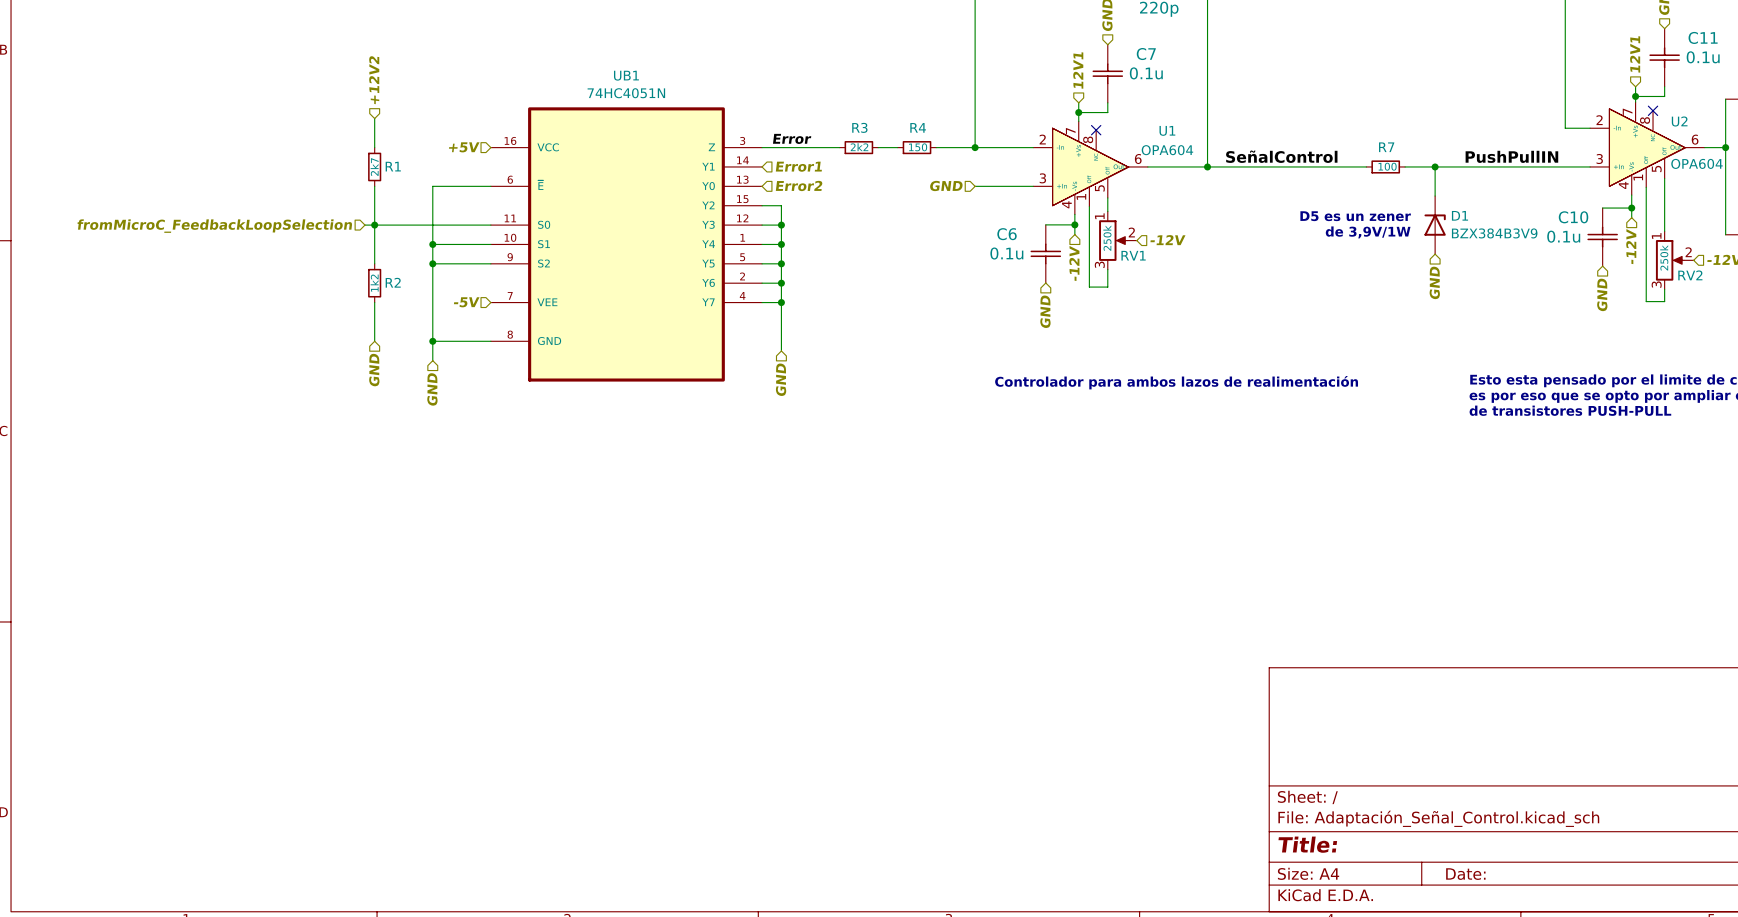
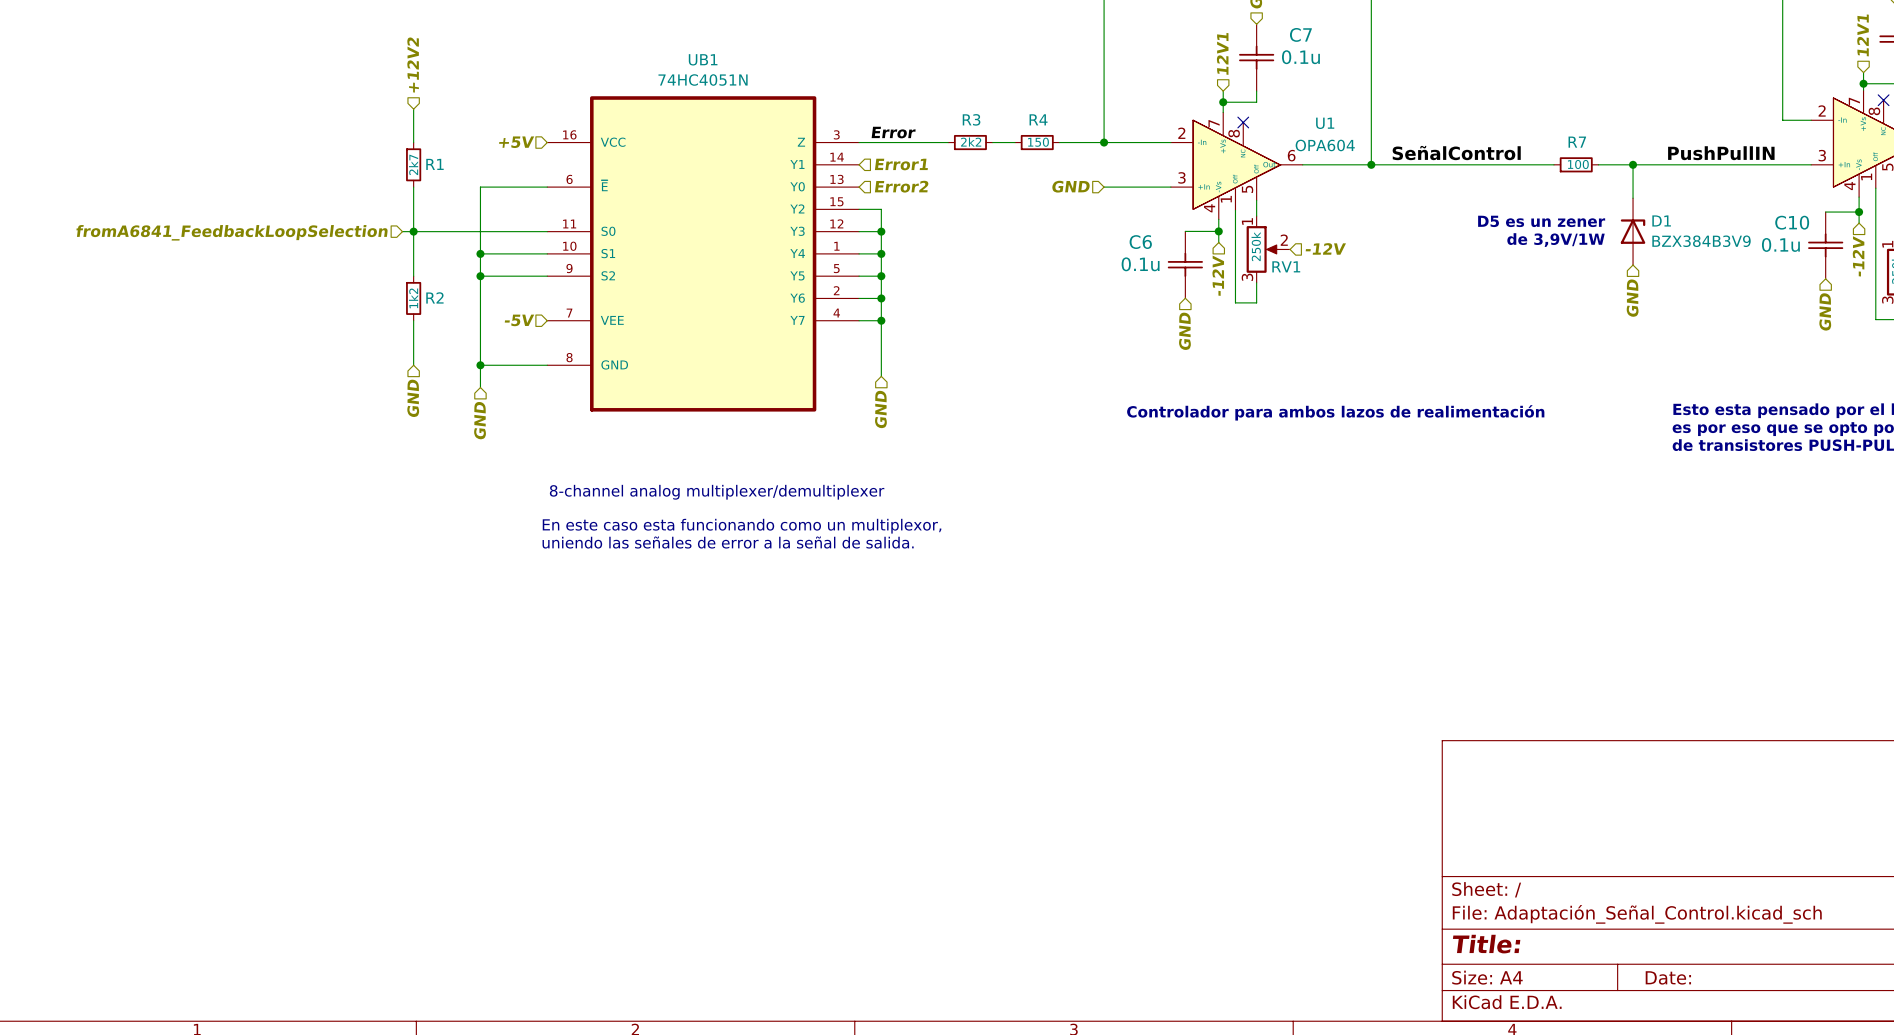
hierarchical label: fromMicroC_FeedbackLoopSelection (214, 226) -> fromA6841_FeedbackLoopSelection (232, 232)
text: none -> 8-channel analog multiplexer/demultiplexer (717, 492)
text: none -> En este caso esta funcionando como un multiplexor, (742, 526)
text: none -> uniendo las señales de error a la señal de salida. (728, 542)

